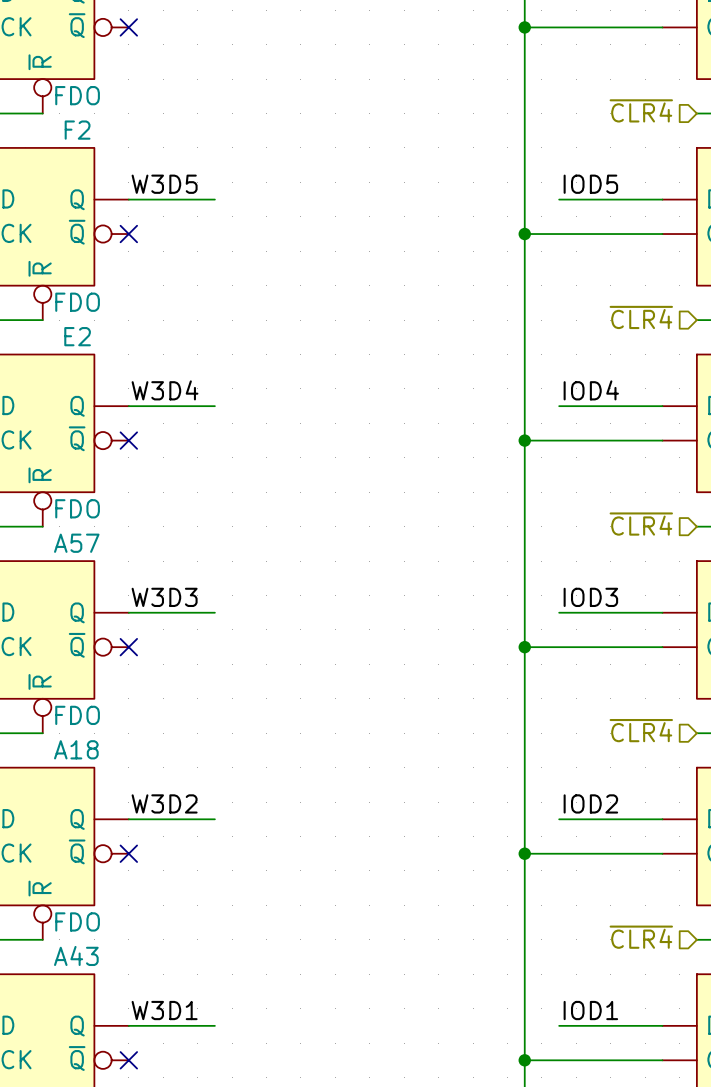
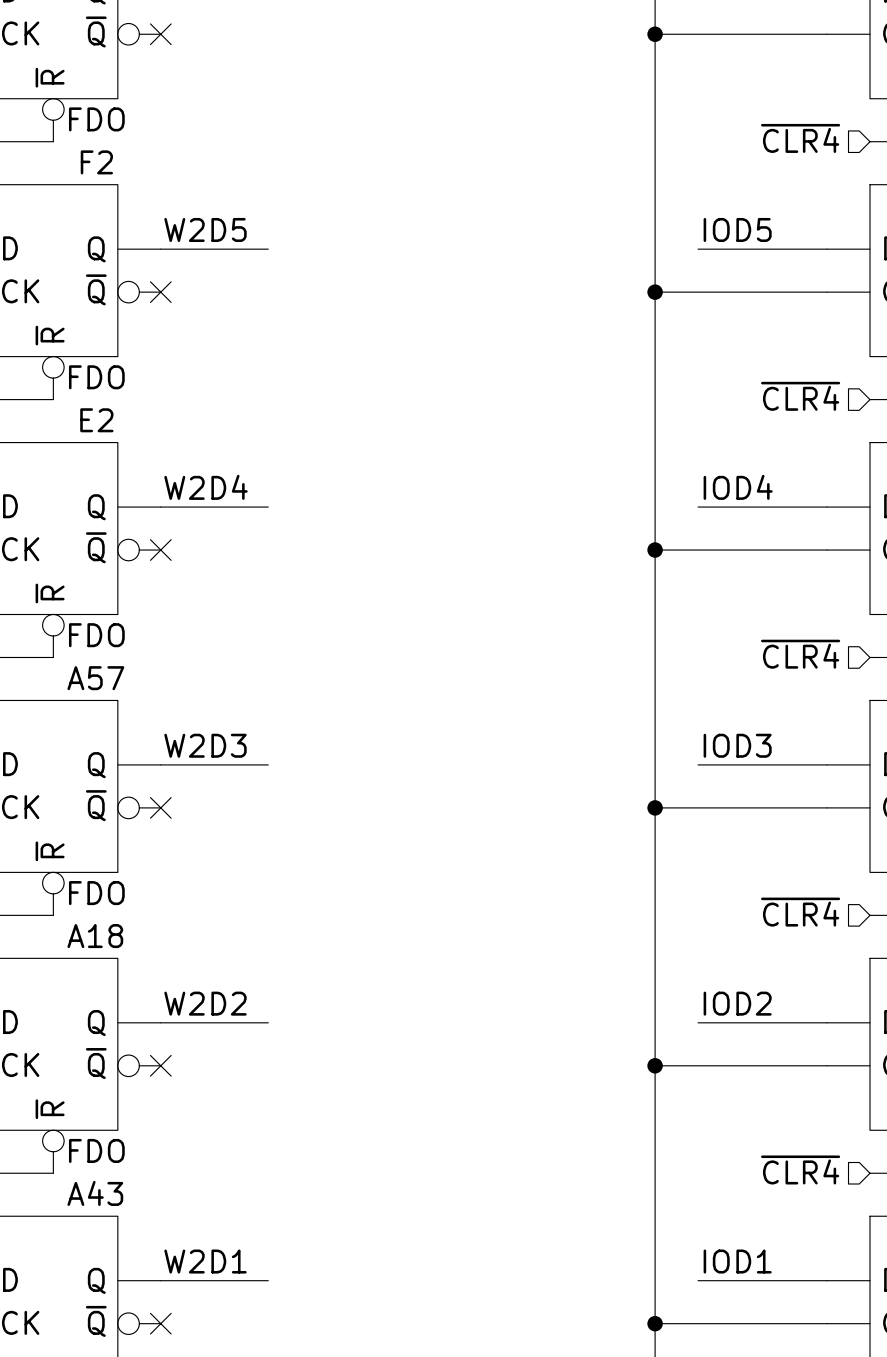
label: W3D5 (164, 184) -> W2D5 (205, 229)
label: W3D4 (165, 390) -> W2D4 (206, 487)
label: W3D3 (164, 597) -> W2D3 (205, 745)
label: W3D2 (164, 803) -> W2D2 (205, 1003)
label: W3D1 (164, 1010) -> W2D1 (205, 1261)

